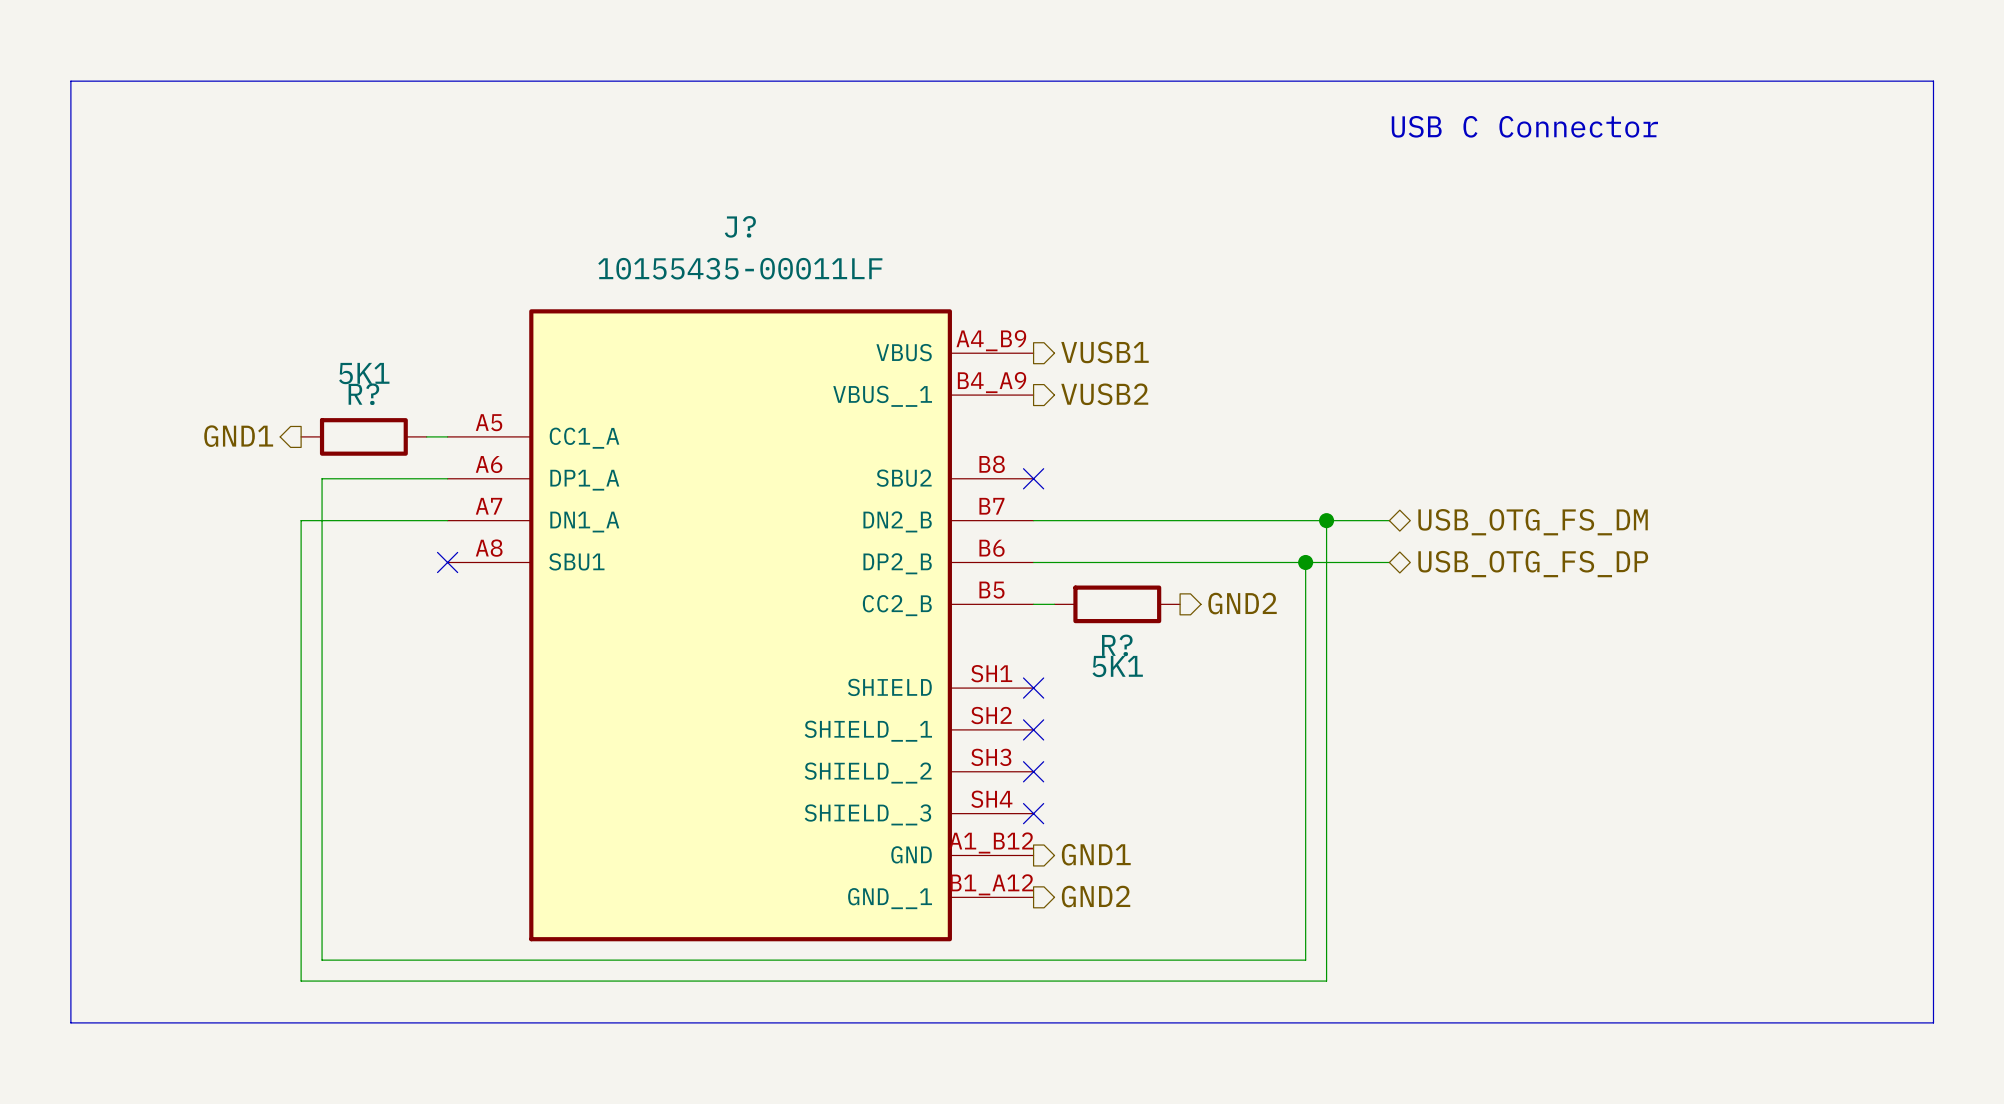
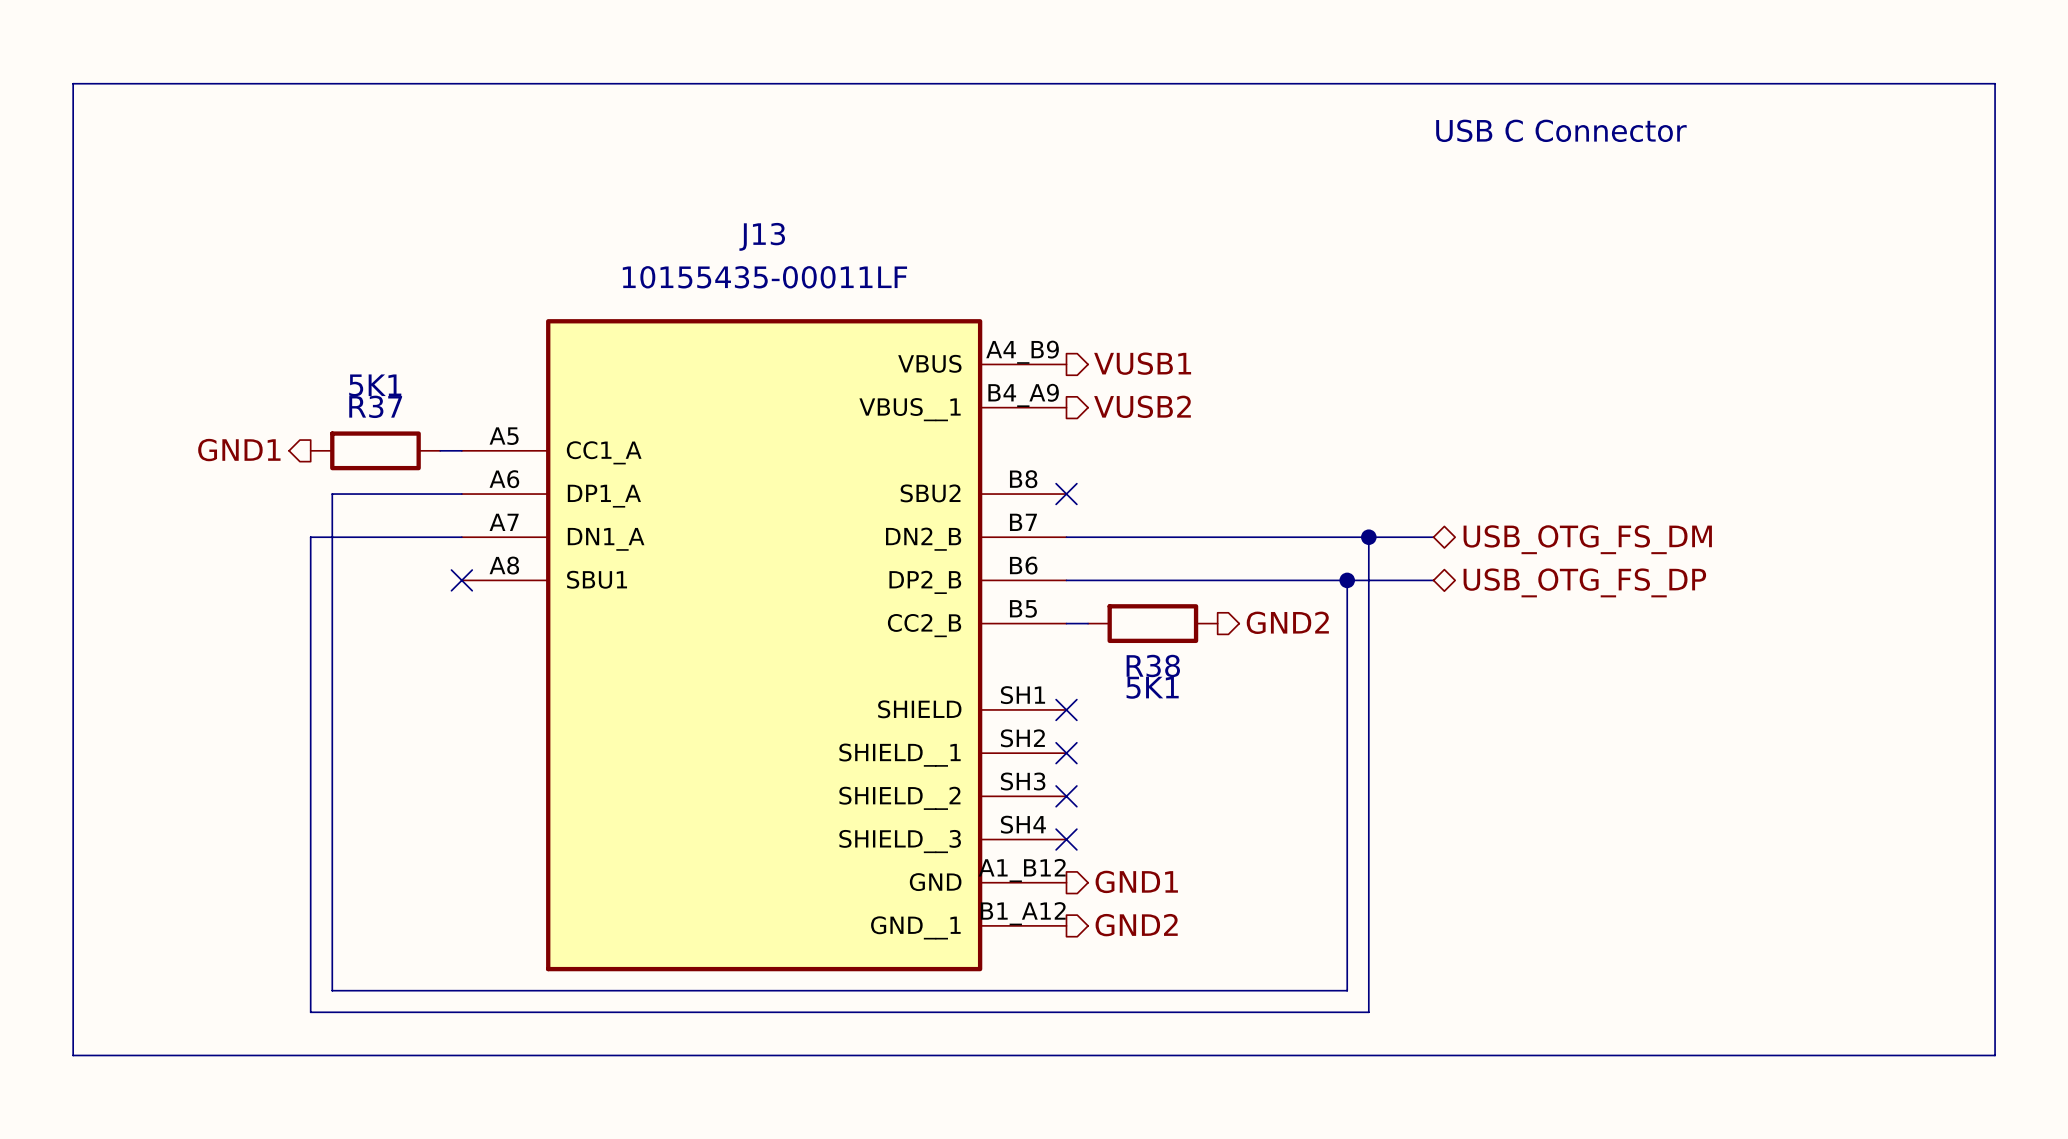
J? name: J? (740, 226) -> J13 (762, 236)
R? name: R? (363, 394) -> R37 (375, 406)
R? name: R? (1117, 645) -> R38 (1153, 665)

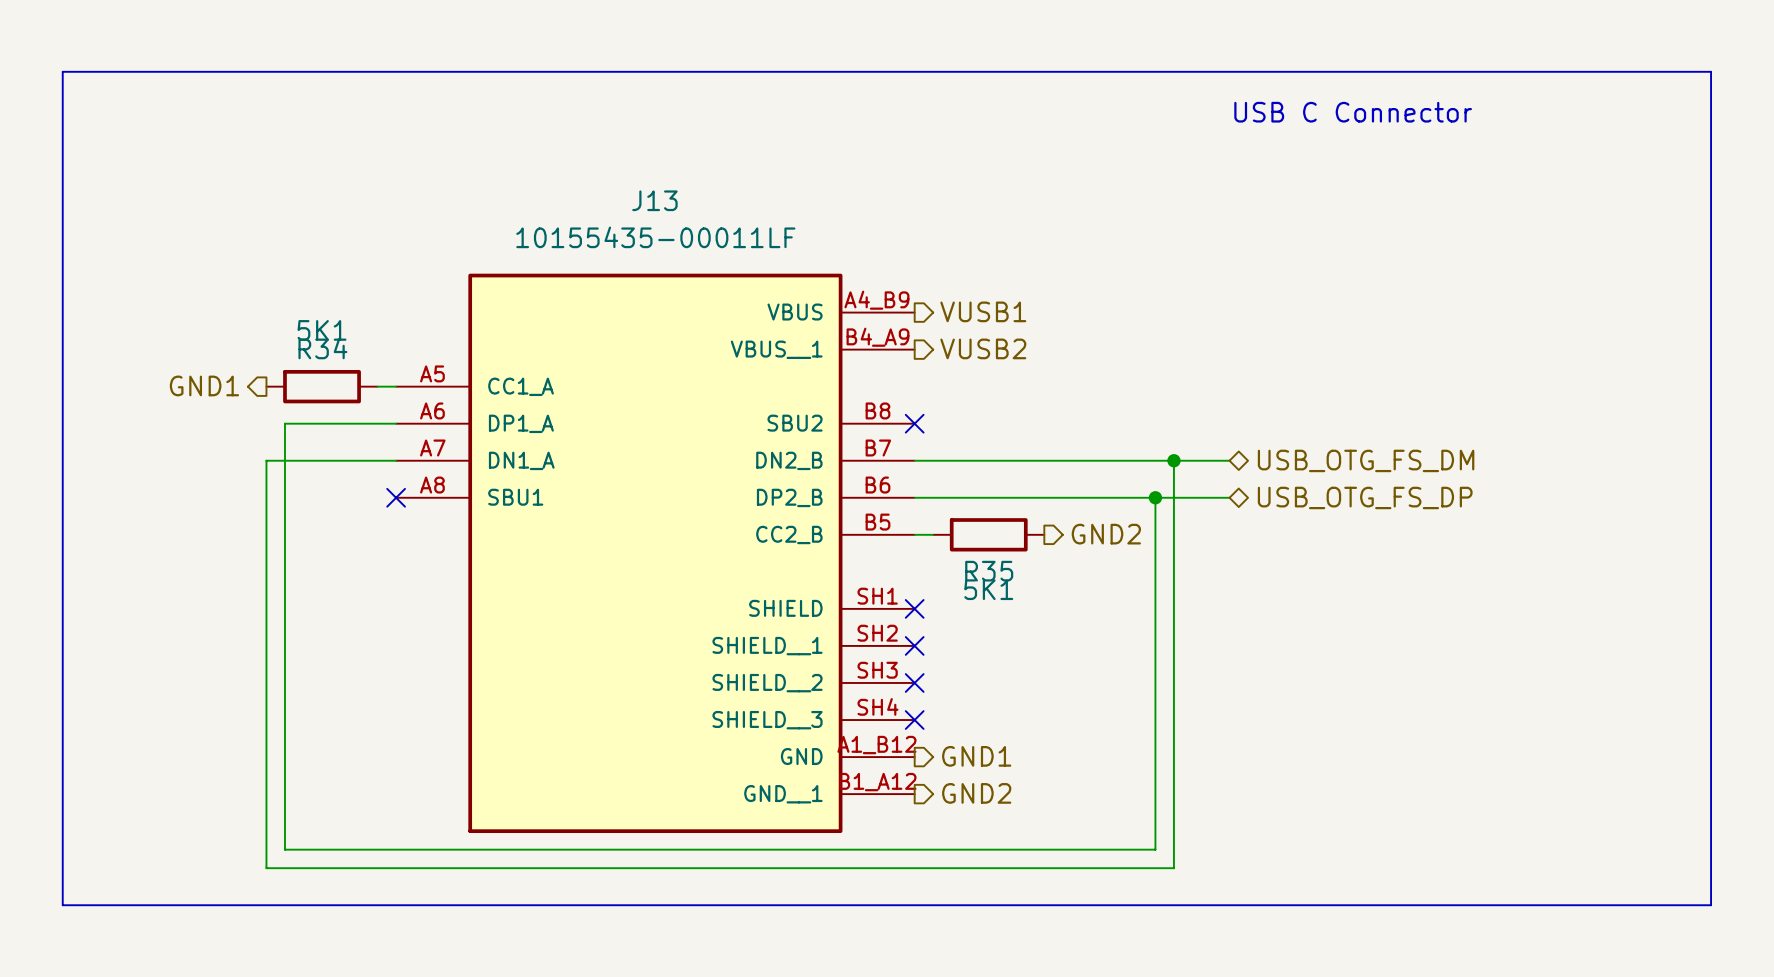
R37 name: R37 (375, 406) -> R34 (322, 348)
R38 name: R38 (1153, 665) -> R35 (989, 571)

